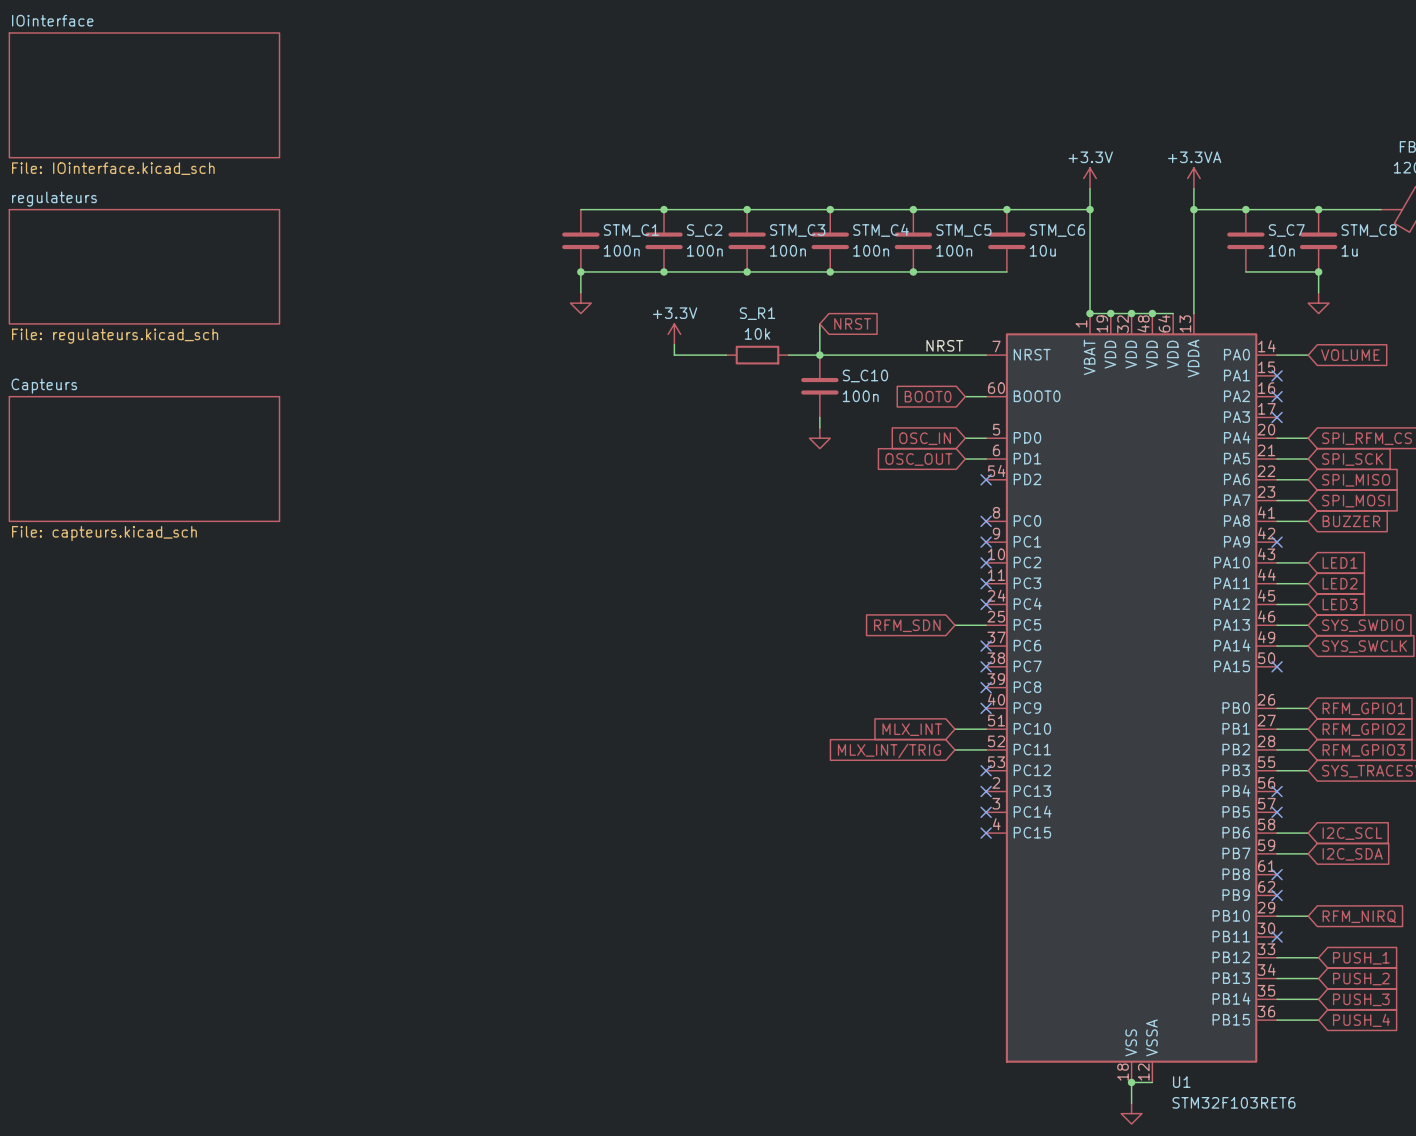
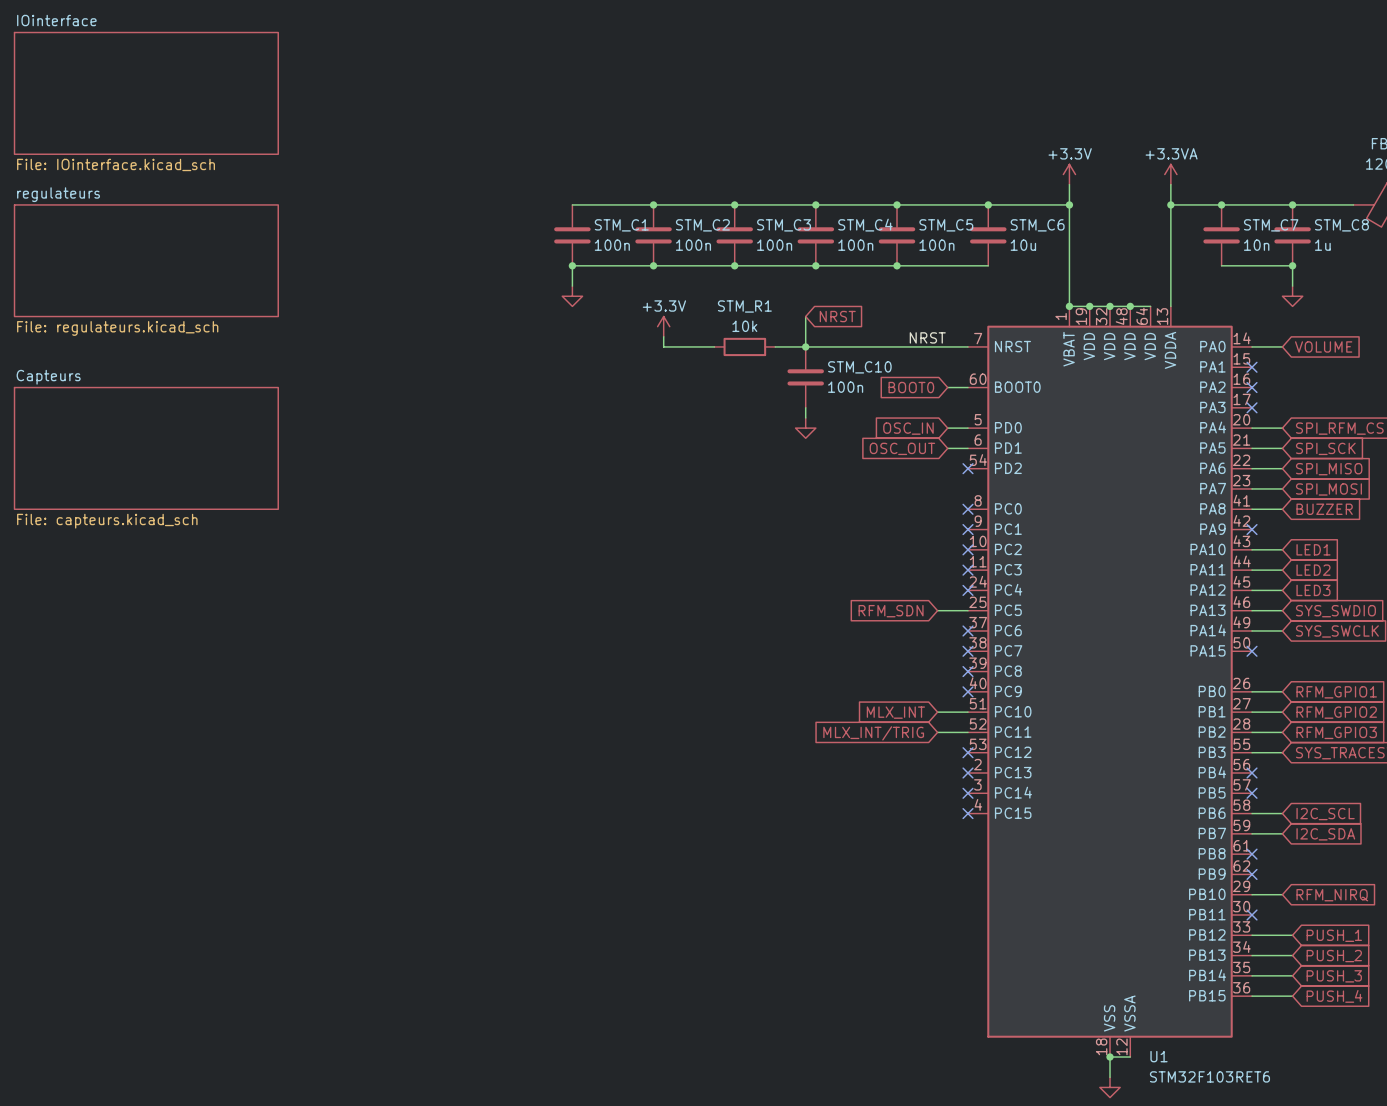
S_C2 name: S_C2 (704, 230) -> STM_C2 (702, 225)
S_C7 name: S_C7 (1286, 230) -> STM_C7 (1271, 225)
S_R1 name: S_R1 (757, 313) -> STM_R1 (744, 306)
S_C10 name: S_C10 (865, 375) -> STM_C10 (859, 367)

